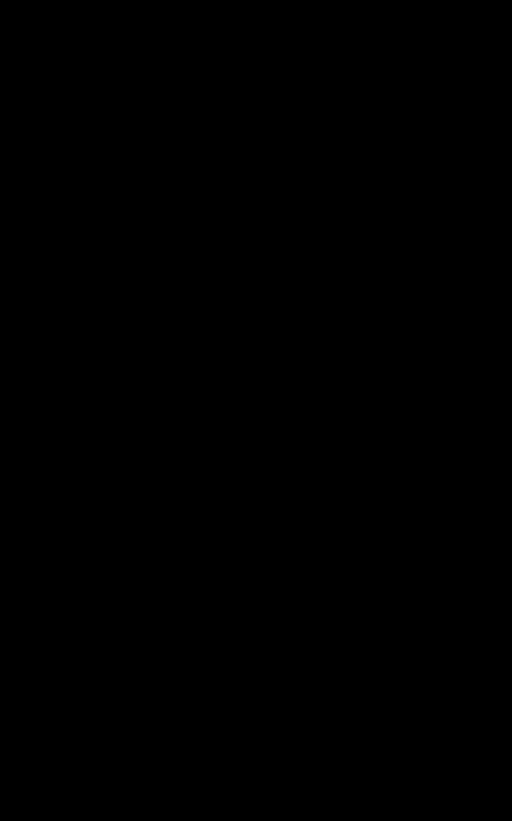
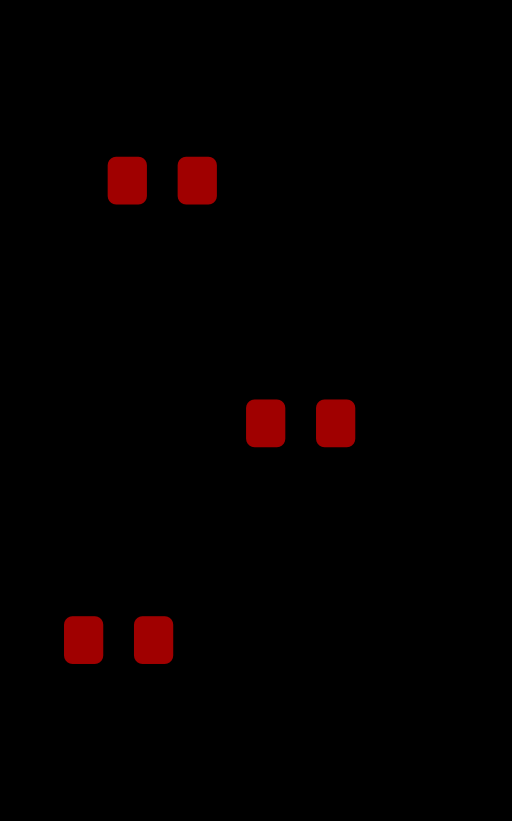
part: none -> (162, 180)
part: none -> (300, 423)
part: none -> (118, 640)

